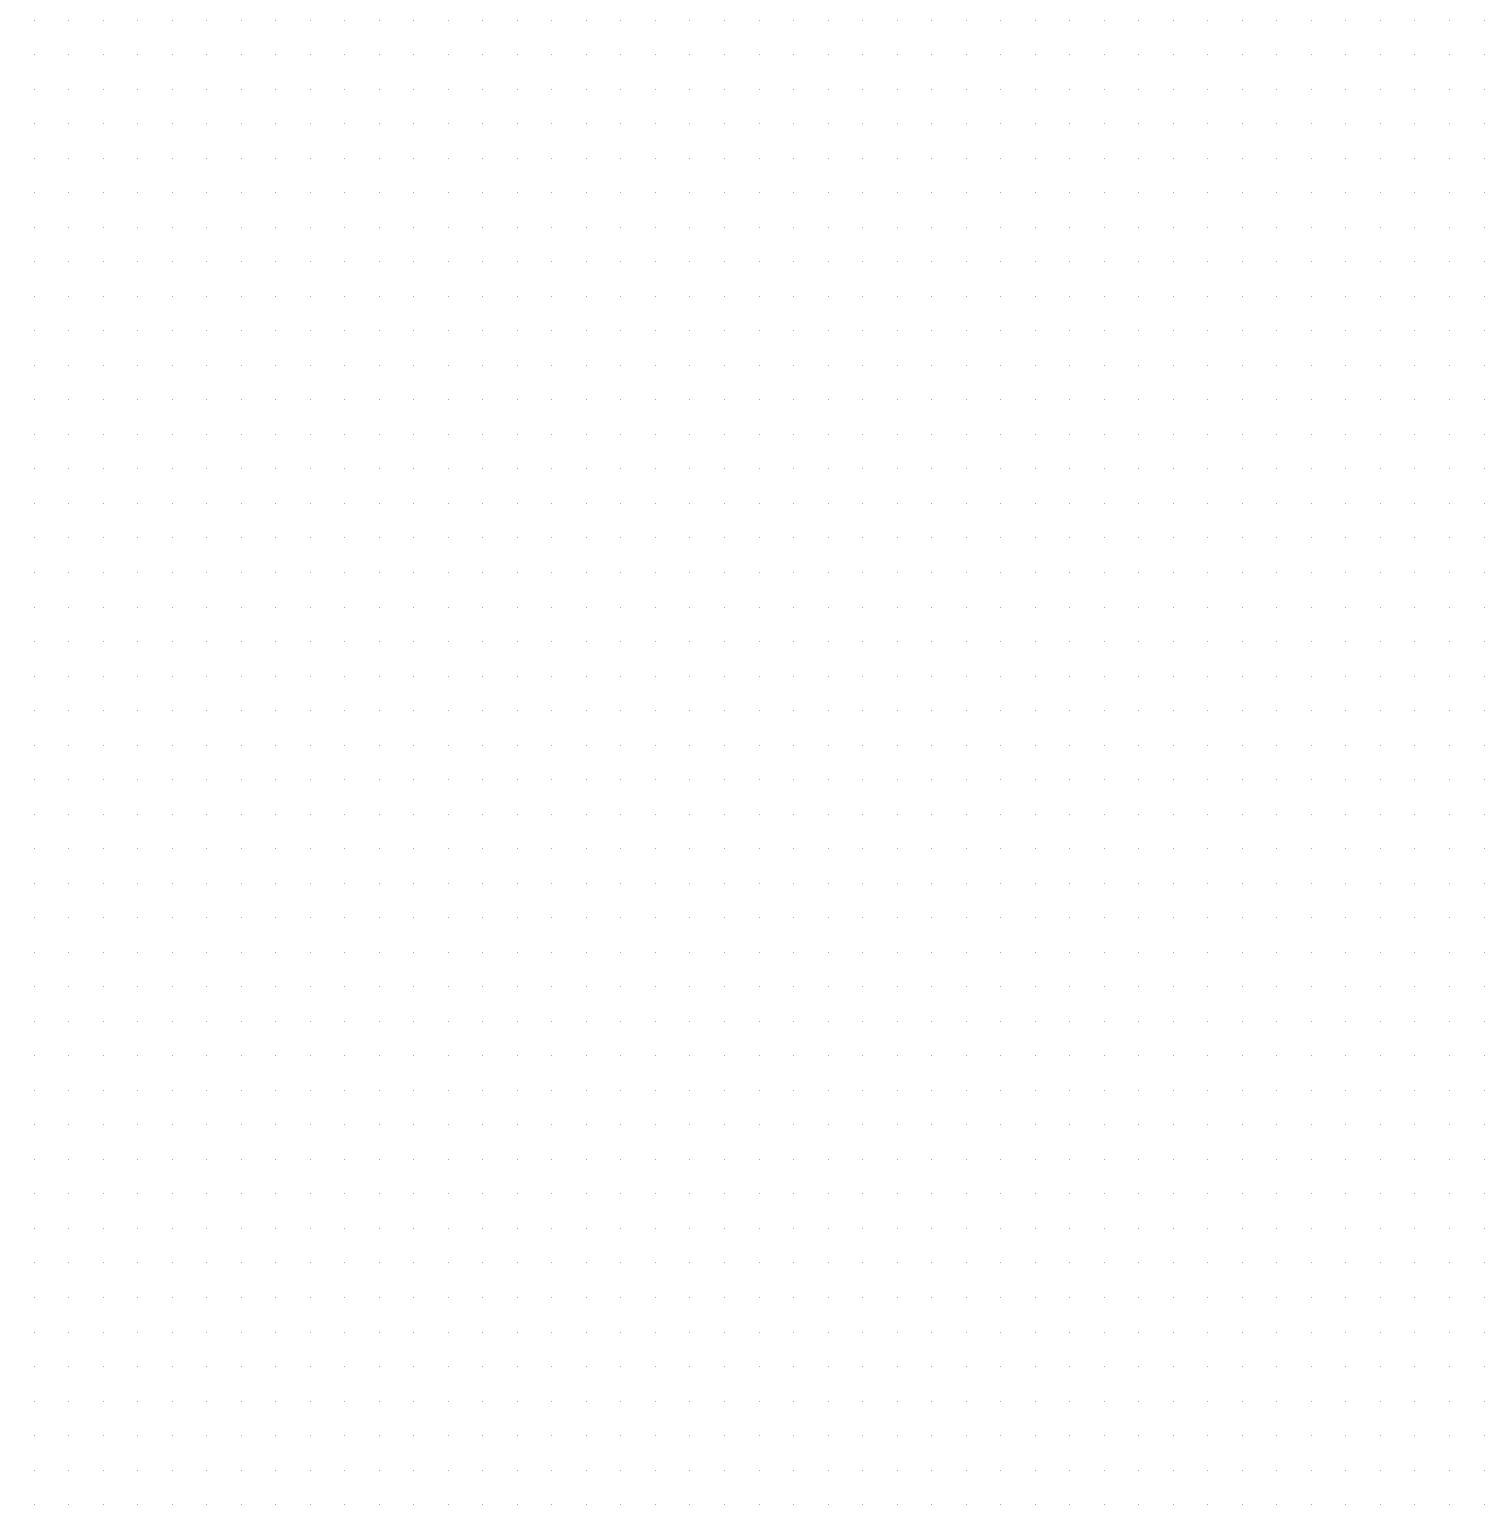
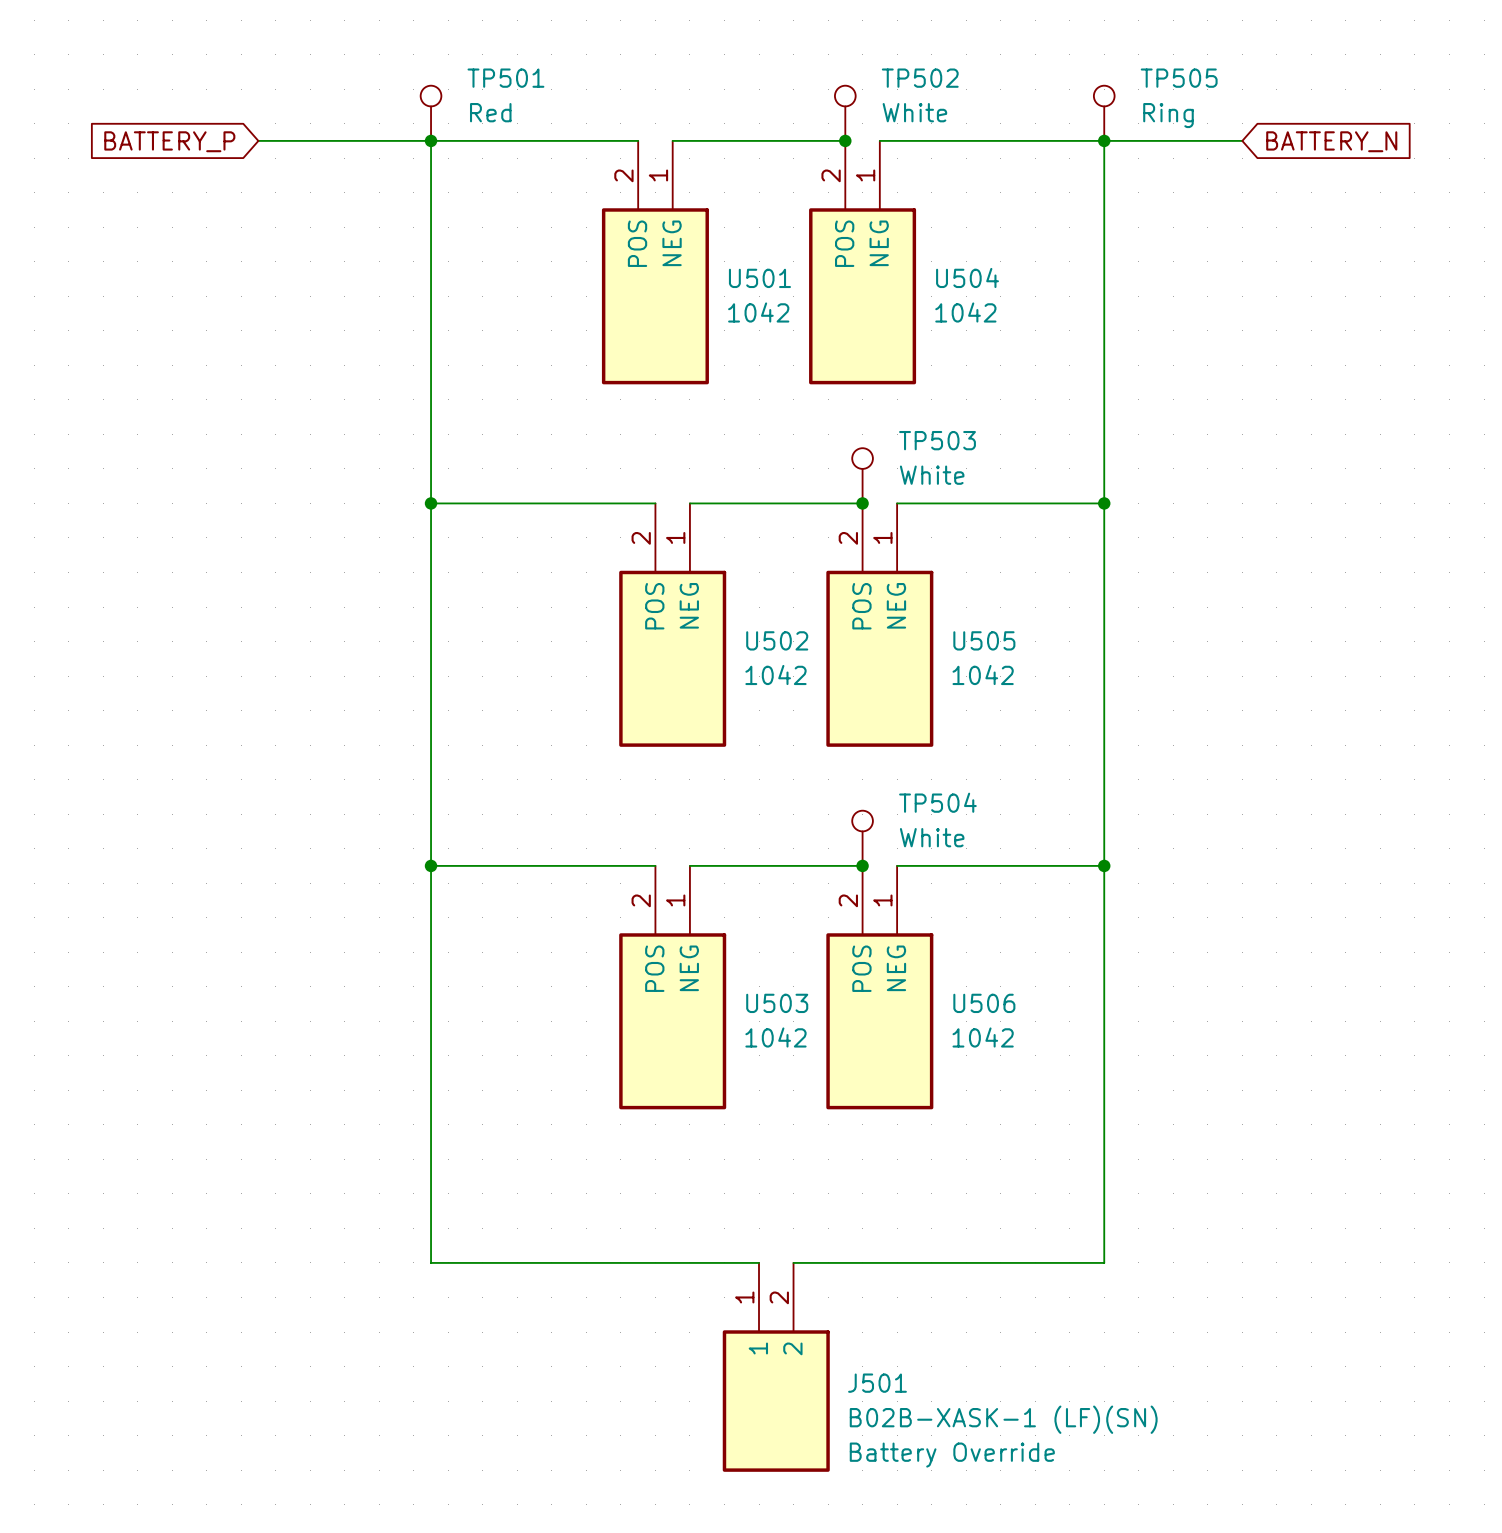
TP501: none -> Red (431, 113)
TP502: none -> White (845, 113)
TP505: none -> Ring (1104, 113)
wire: none -> (258, 140) (638, 140)
wire: none -> (431, 140) (431, 1262) (759, 1262)
junction: none -> (431, 140)
wire: none -> (672, 140) (845, 140)
junction: none -> (845, 140)
wire: none -> (879, 140) (1242, 140)
wire: none -> (1104, 140) (1104, 1262) (793, 1262)
junction: none -> (1104, 140)
global label: none -> BATTERY_P (169, 141)
global label: none -> BATTERY_N (1331, 141)
U501: none -> 1042 (655, 262)
U504: none -> 1042 (862, 262)
TP503: none -> White (862, 475)
wire: none -> (431, 503) (655, 503)
junction: none -> (431, 503)
wire: none -> (689, 503) (862, 503)
junction: none -> (862, 503)
wire: none -> (897, 503) (1104, 503)
junction: none -> (1104, 503)
U502: none -> 1042 (672, 625)
U505: none -> 1042 (879, 625)
TP504: none -> White (862, 838)
wire: none -> (431, 865) (655, 865)
junction: none -> (431, 865)
wire: none -> (689, 865) (862, 865)
junction: none -> (862, 865)
wire: none -> (897, 865) (1104, 865)
junction: none -> (1104, 865)
U503: none -> 1042 (672, 987)
U506: none -> 1042 (879, 987)
J501: none -> B02B-XASK-1 (LF)(SN) (776, 1367)

